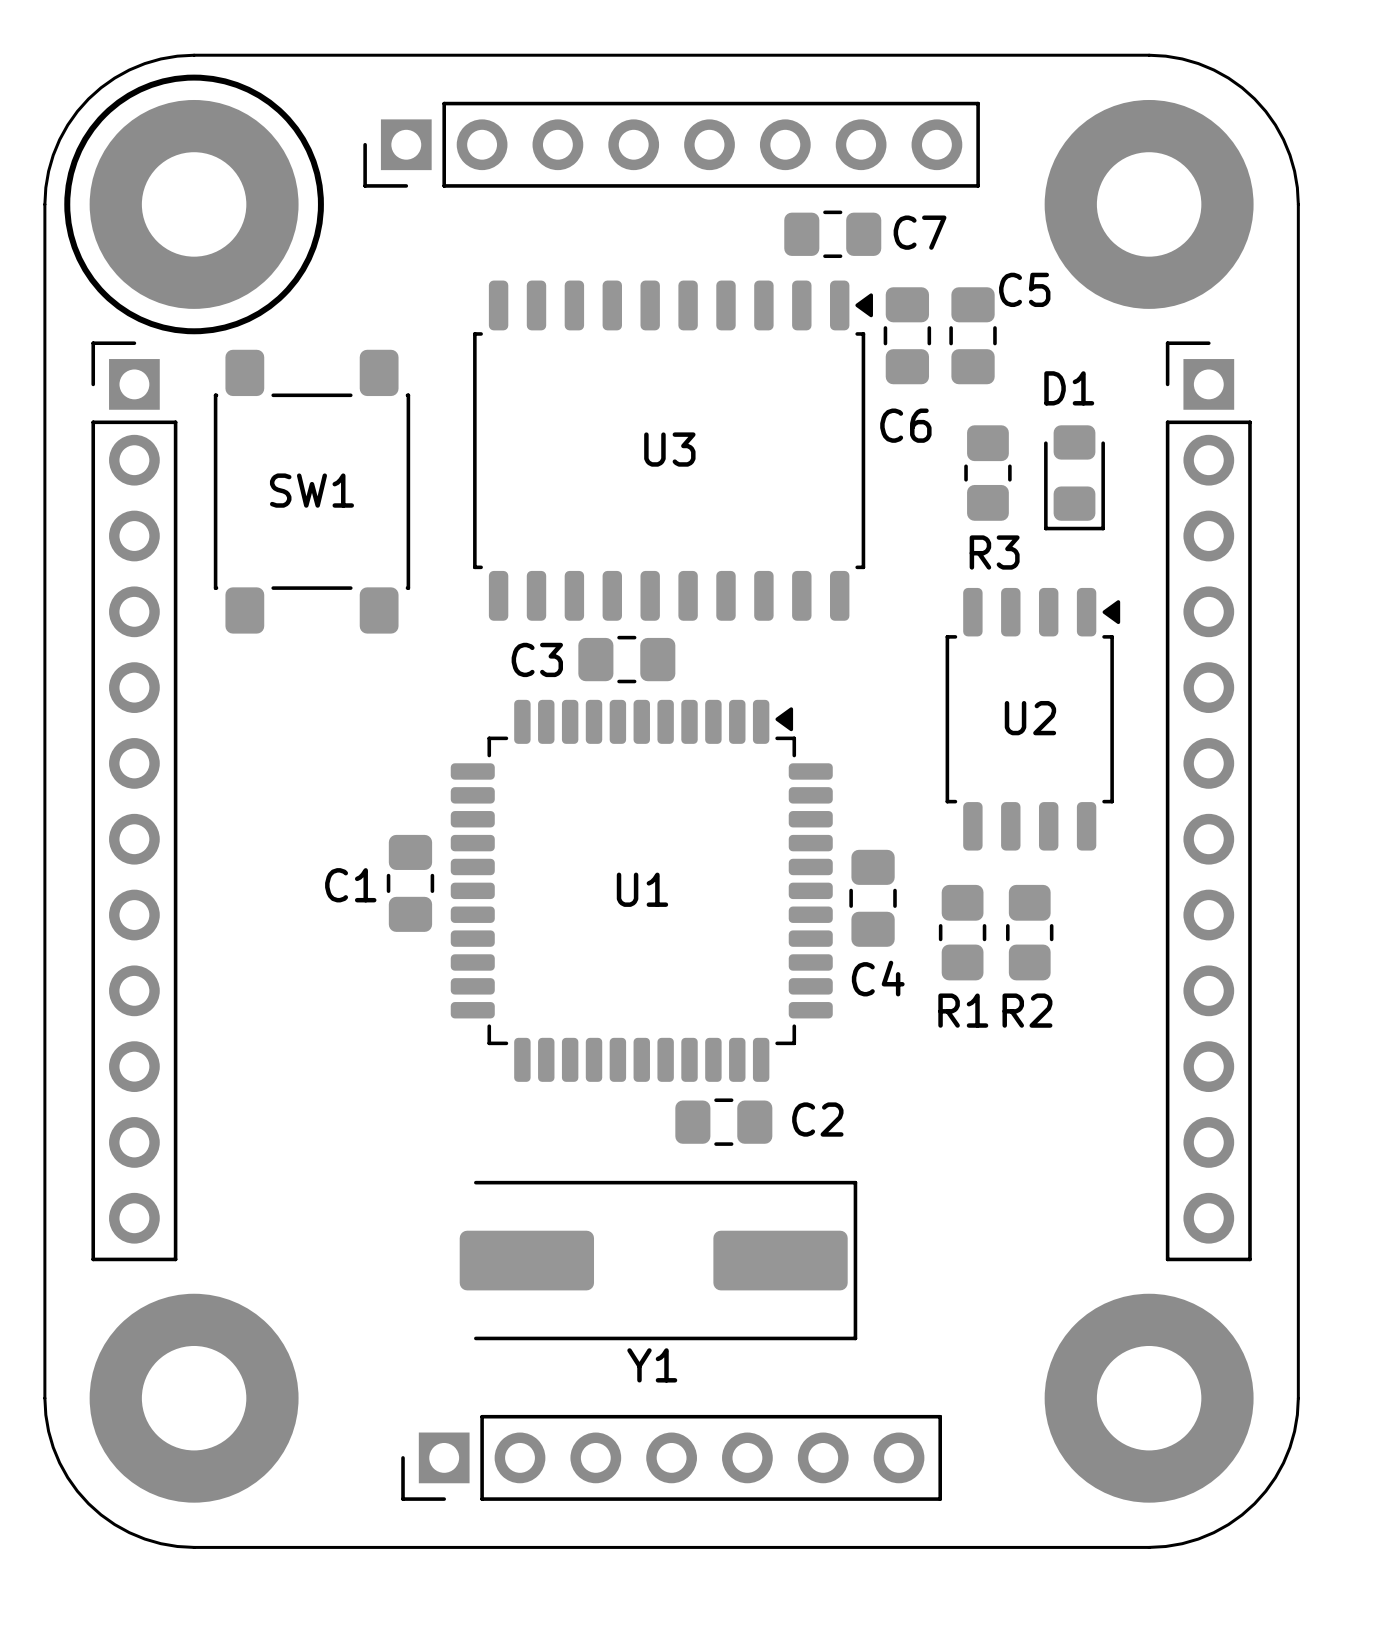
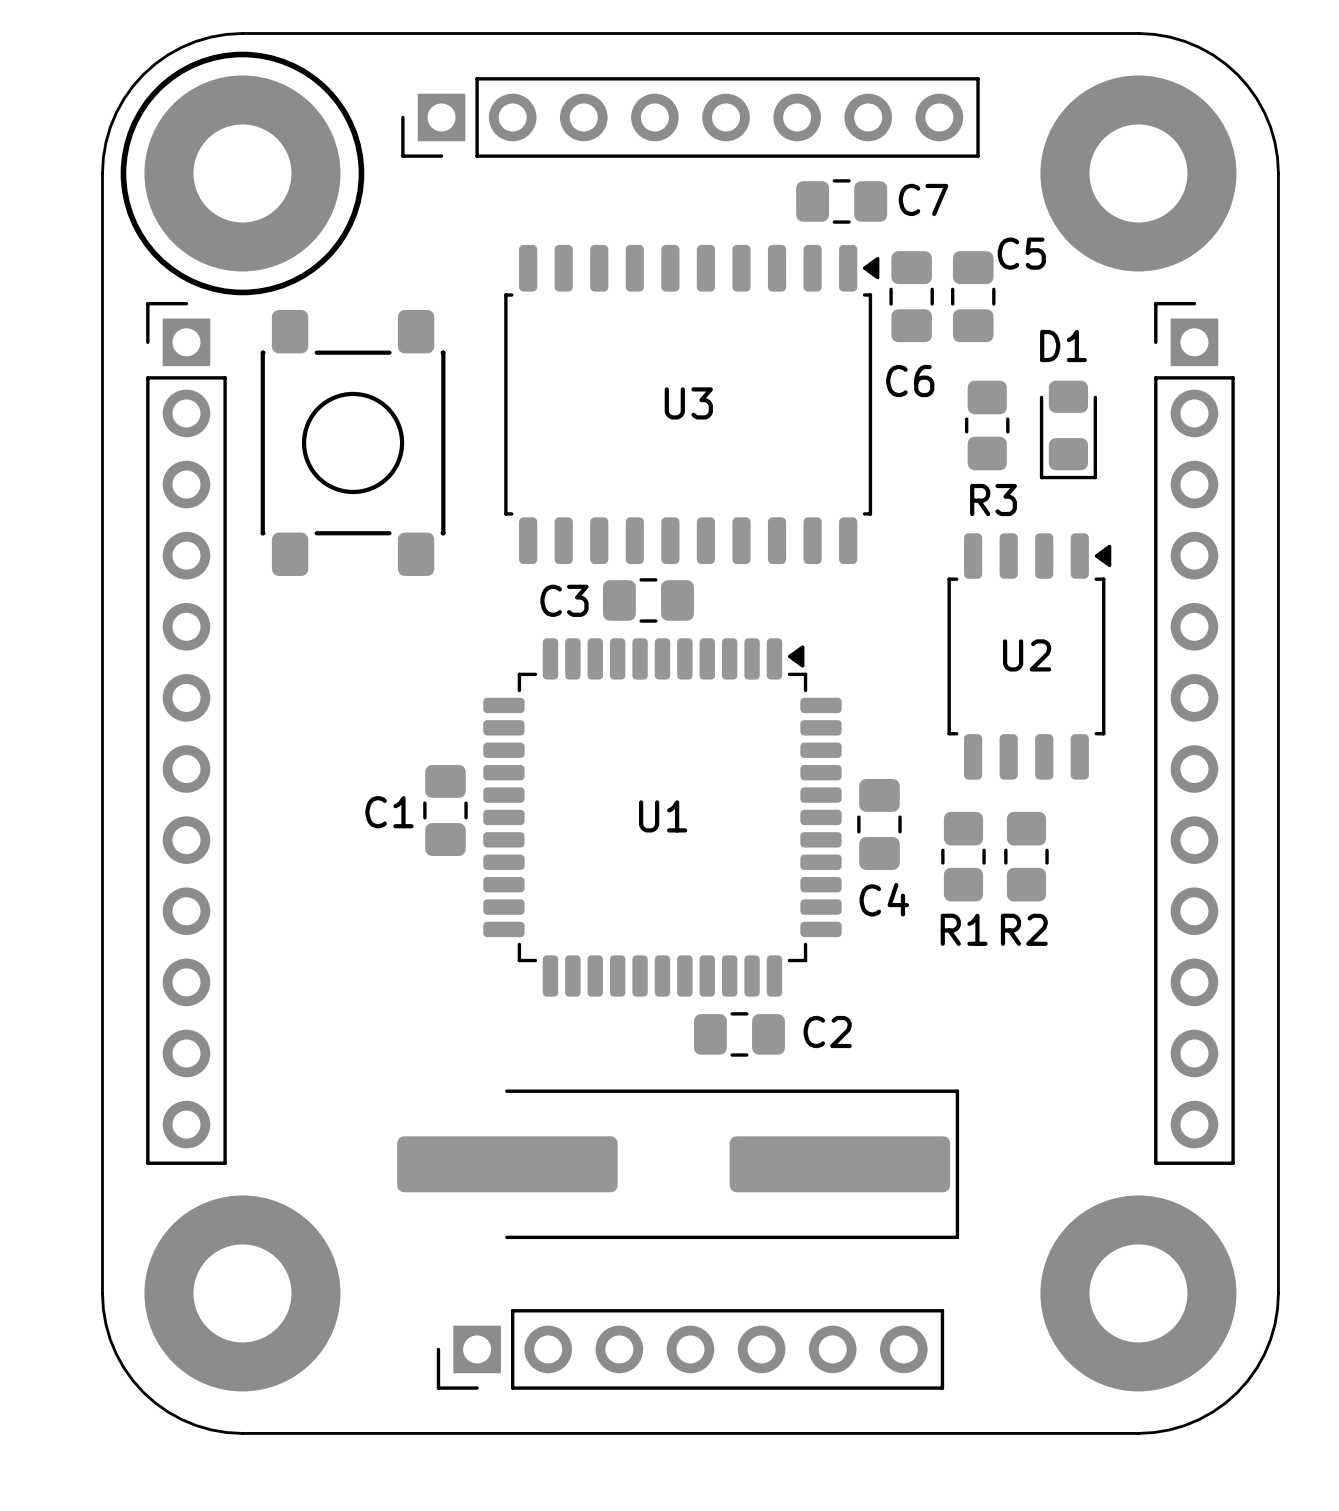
SW1: (311, 491) -> none
part: none -> (353, 442)
Y1: (658, 1260) -> none
part: none -> (678, 1164)

